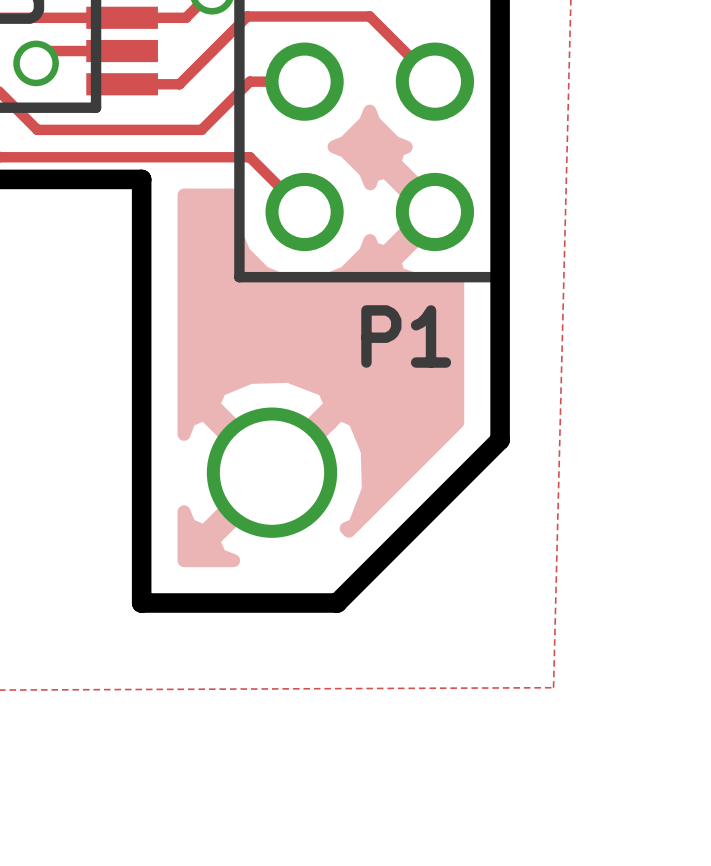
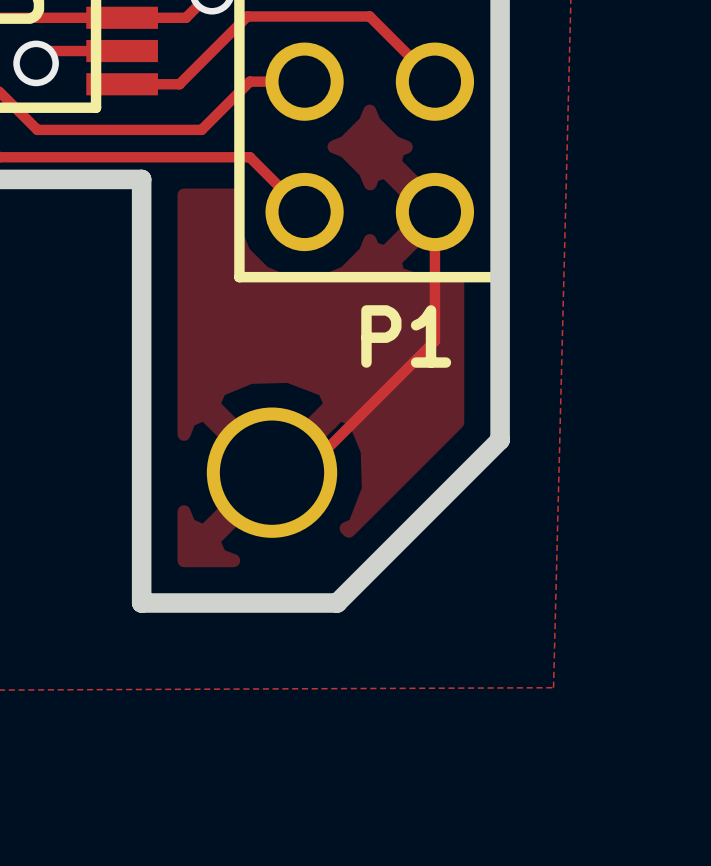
track: none -> (434, 211) (434, 341) (303, 472) (272, 472)

